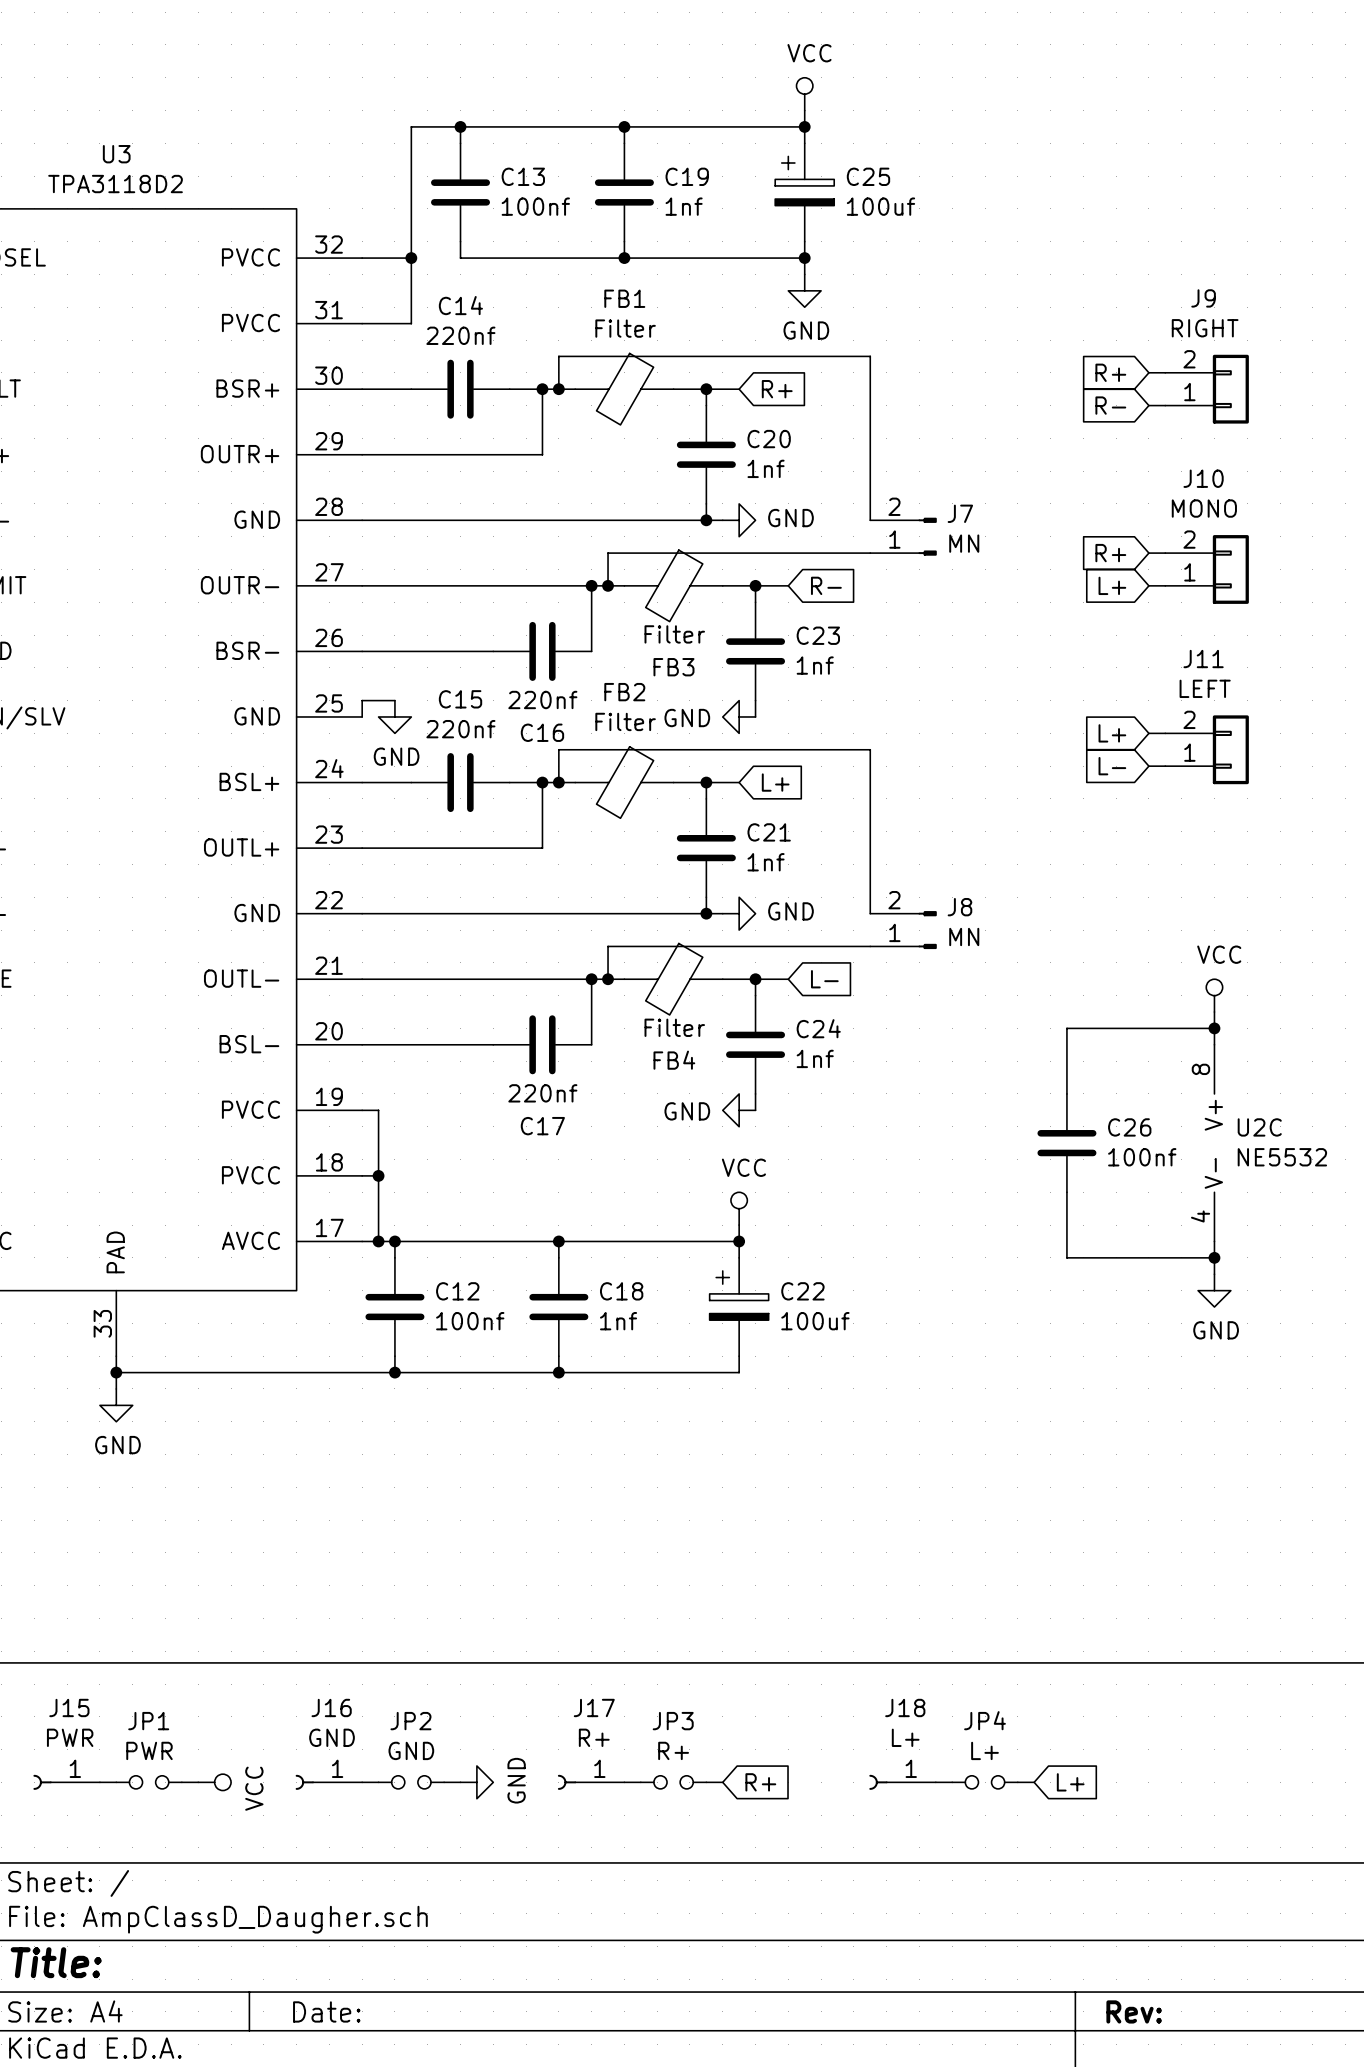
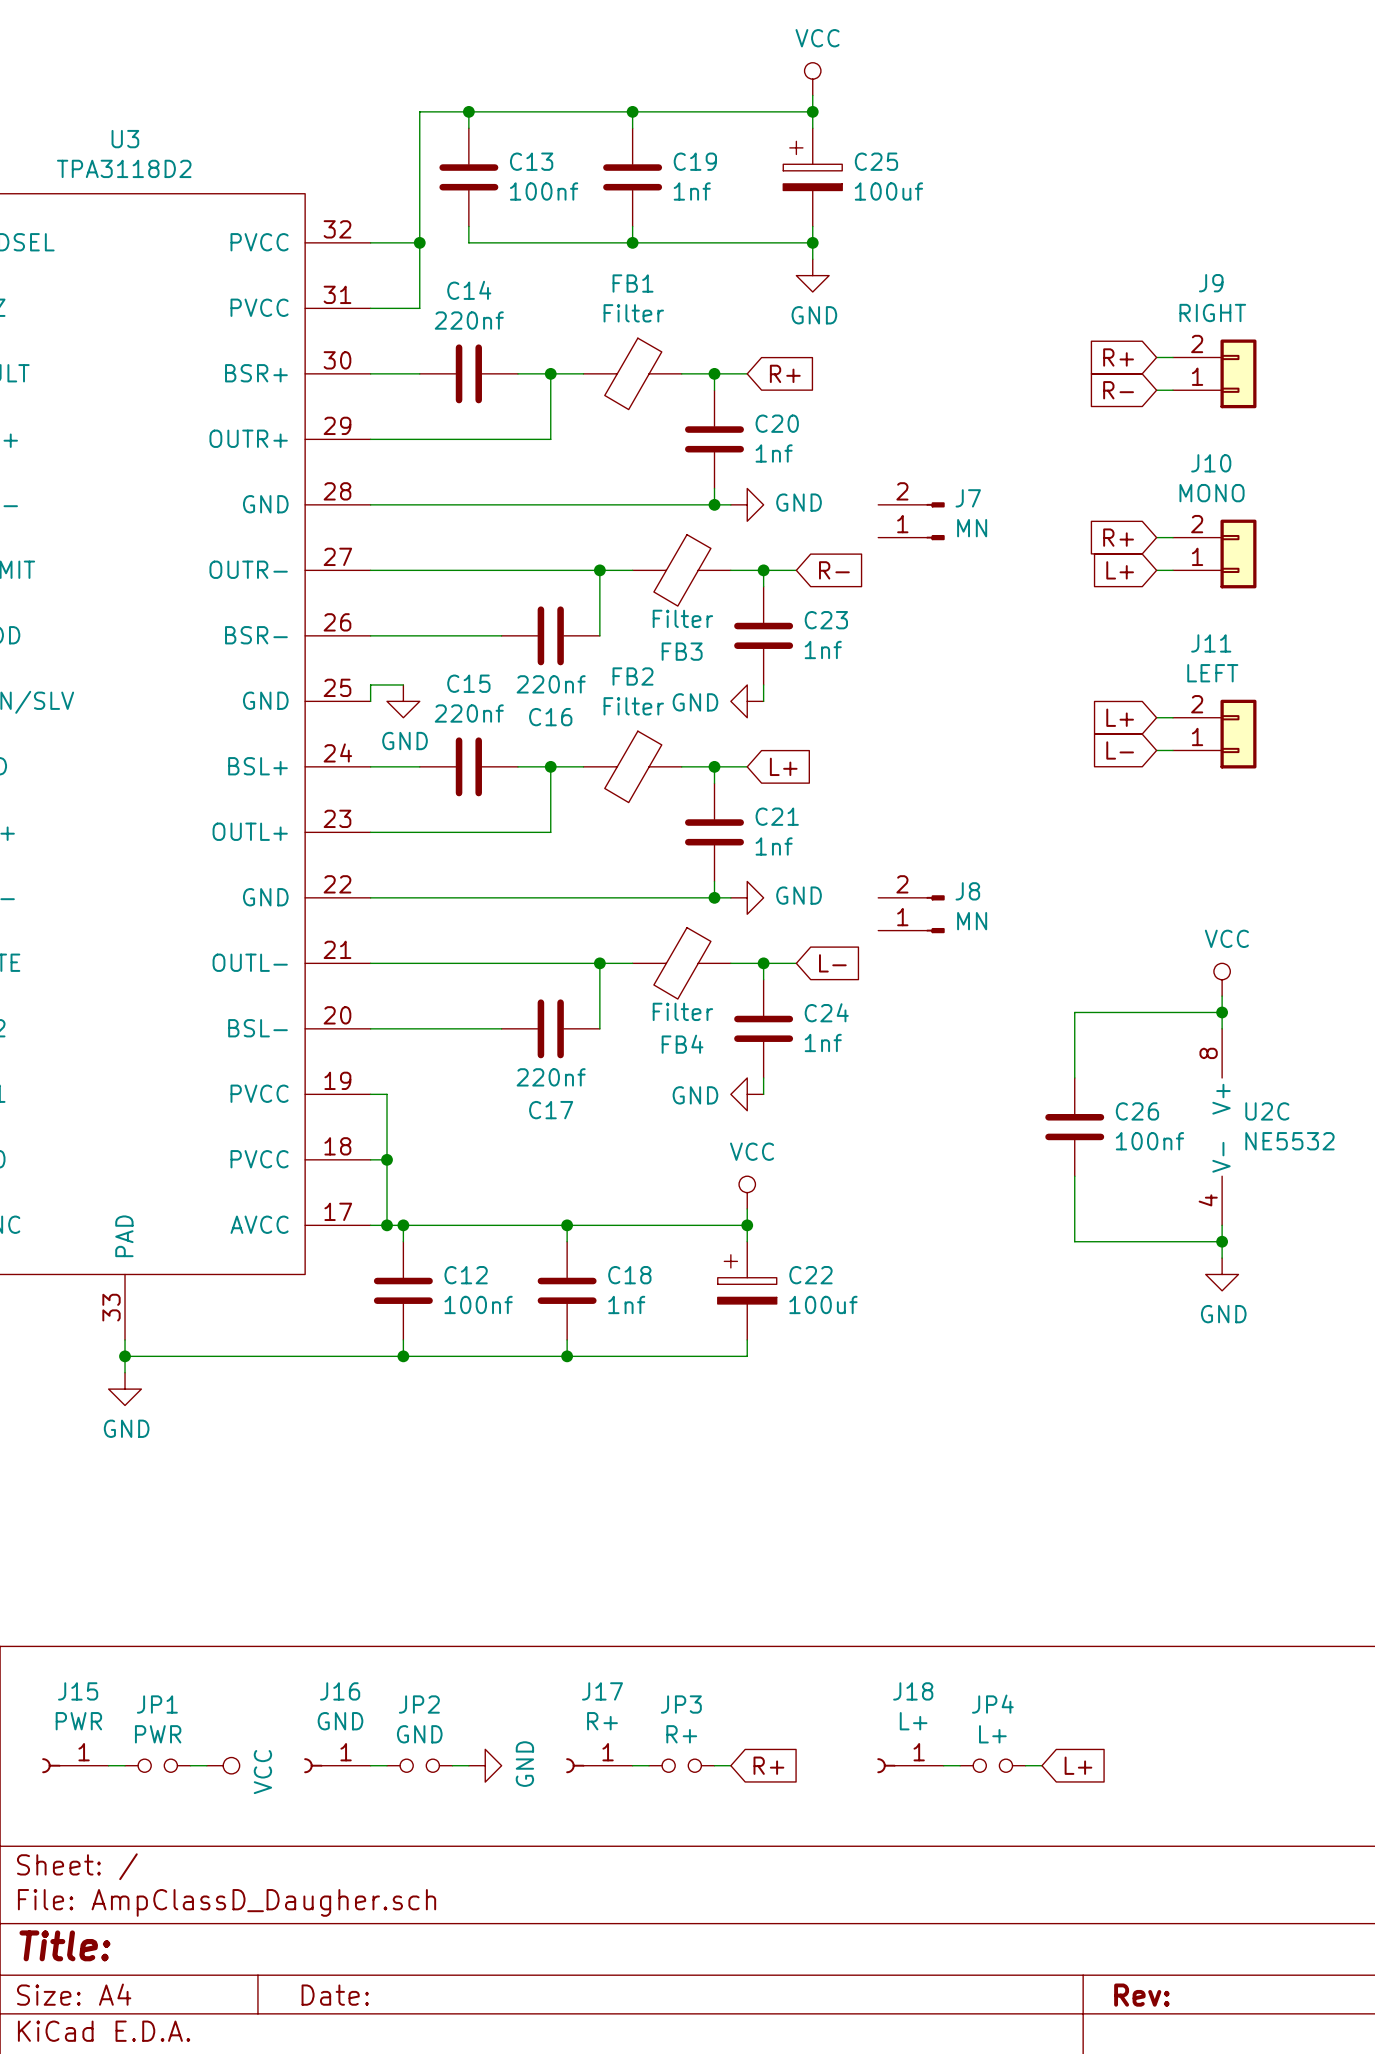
wire: (558, 389) (558, 356) (870, 356) (870, 520) -> none
junction: (558, 389) -> none
wire: (870, 553) (608, 553) (608, 585) -> none
junction: (608, 585) -> none
wire: (558, 782) (558, 749) (870, 749) (870, 913) -> none
junction: (558, 782) -> none
wire: (870, 946) (608, 946) (608, 979) -> none
junction: (608, 979) -> none

